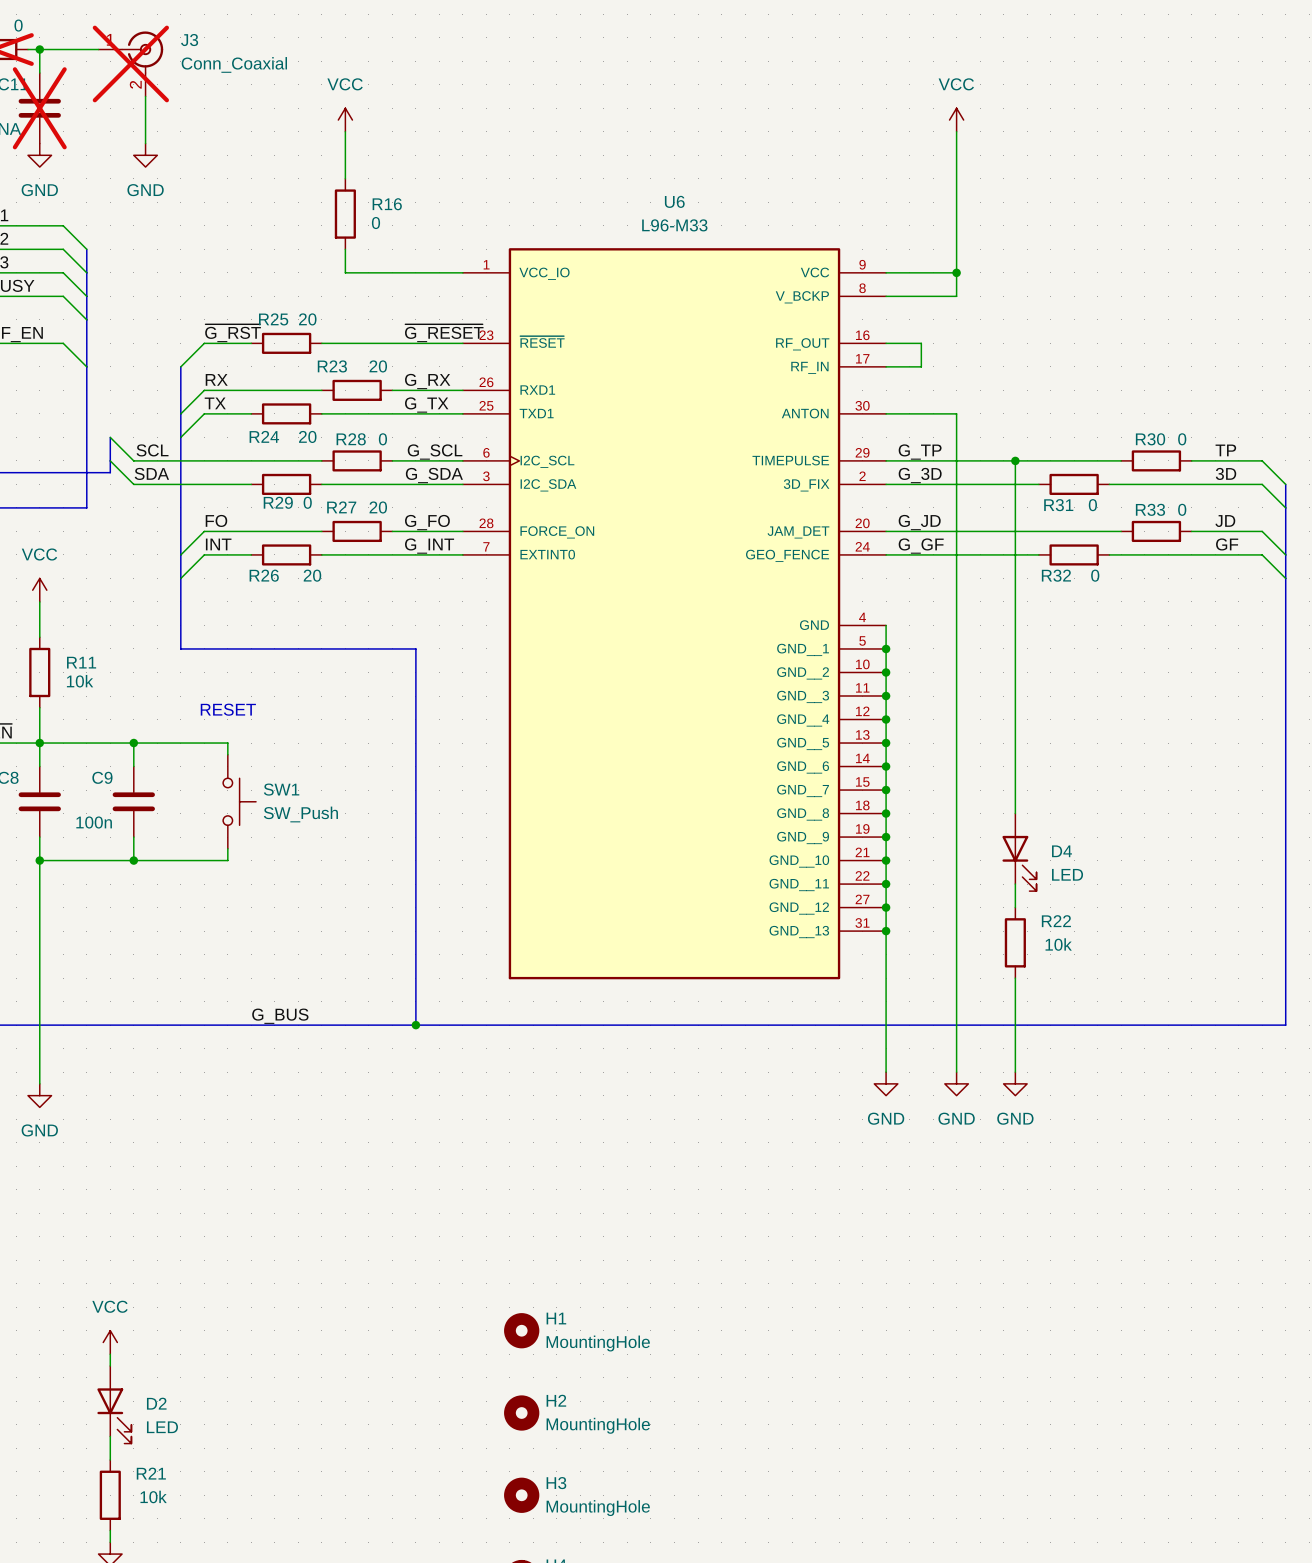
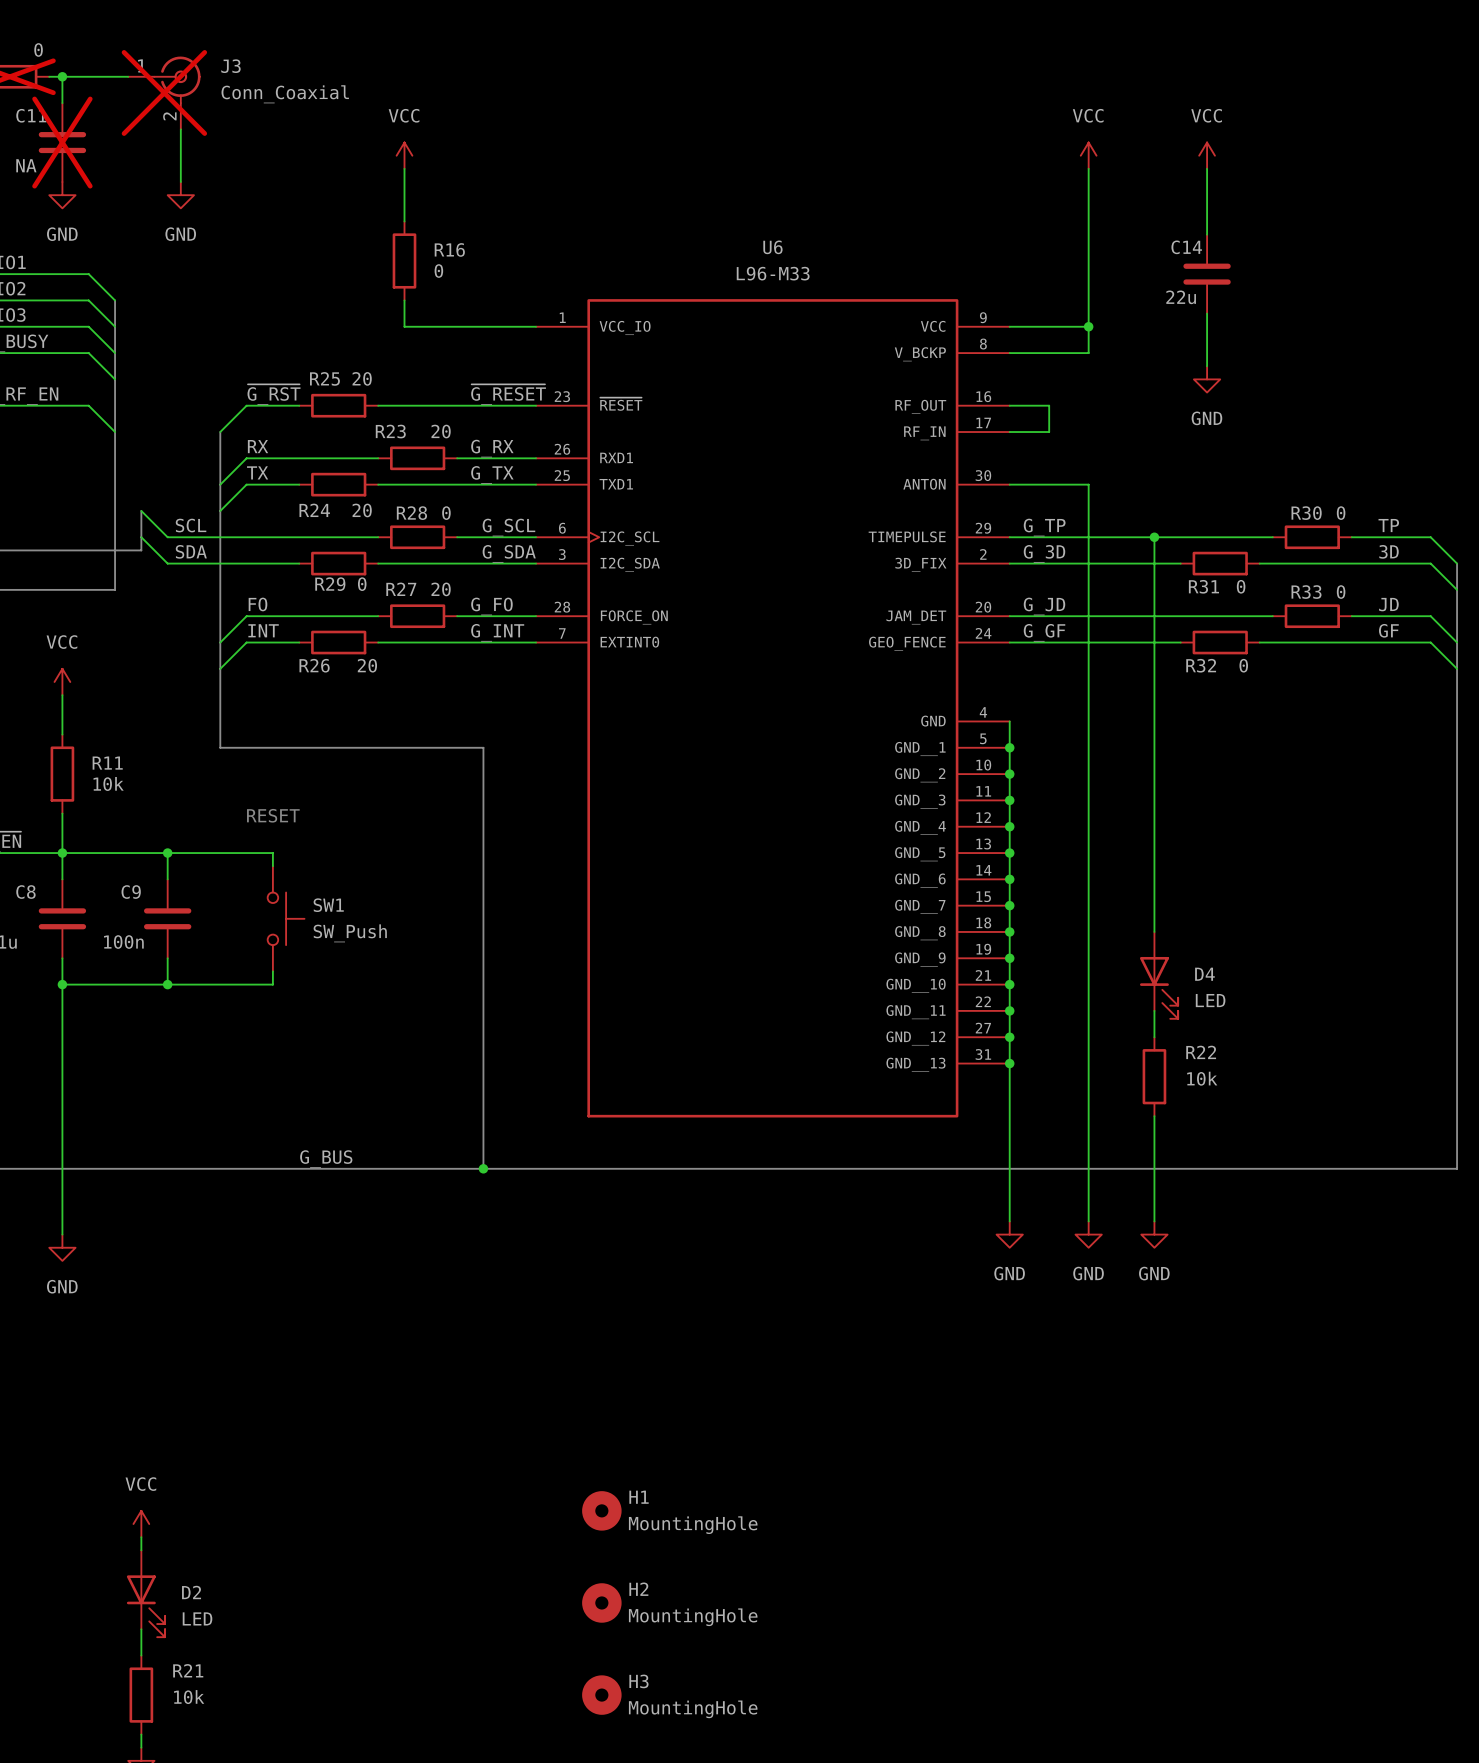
power symbol: none -> VCC (1207, 155)
wire: none -> (1207, 168) (1207, 234)
C14: none -> 22u (1207, 274)
wire: none -> (1207, 313) (1207, 366)
power symbol: none -> GND (1207, 379)

